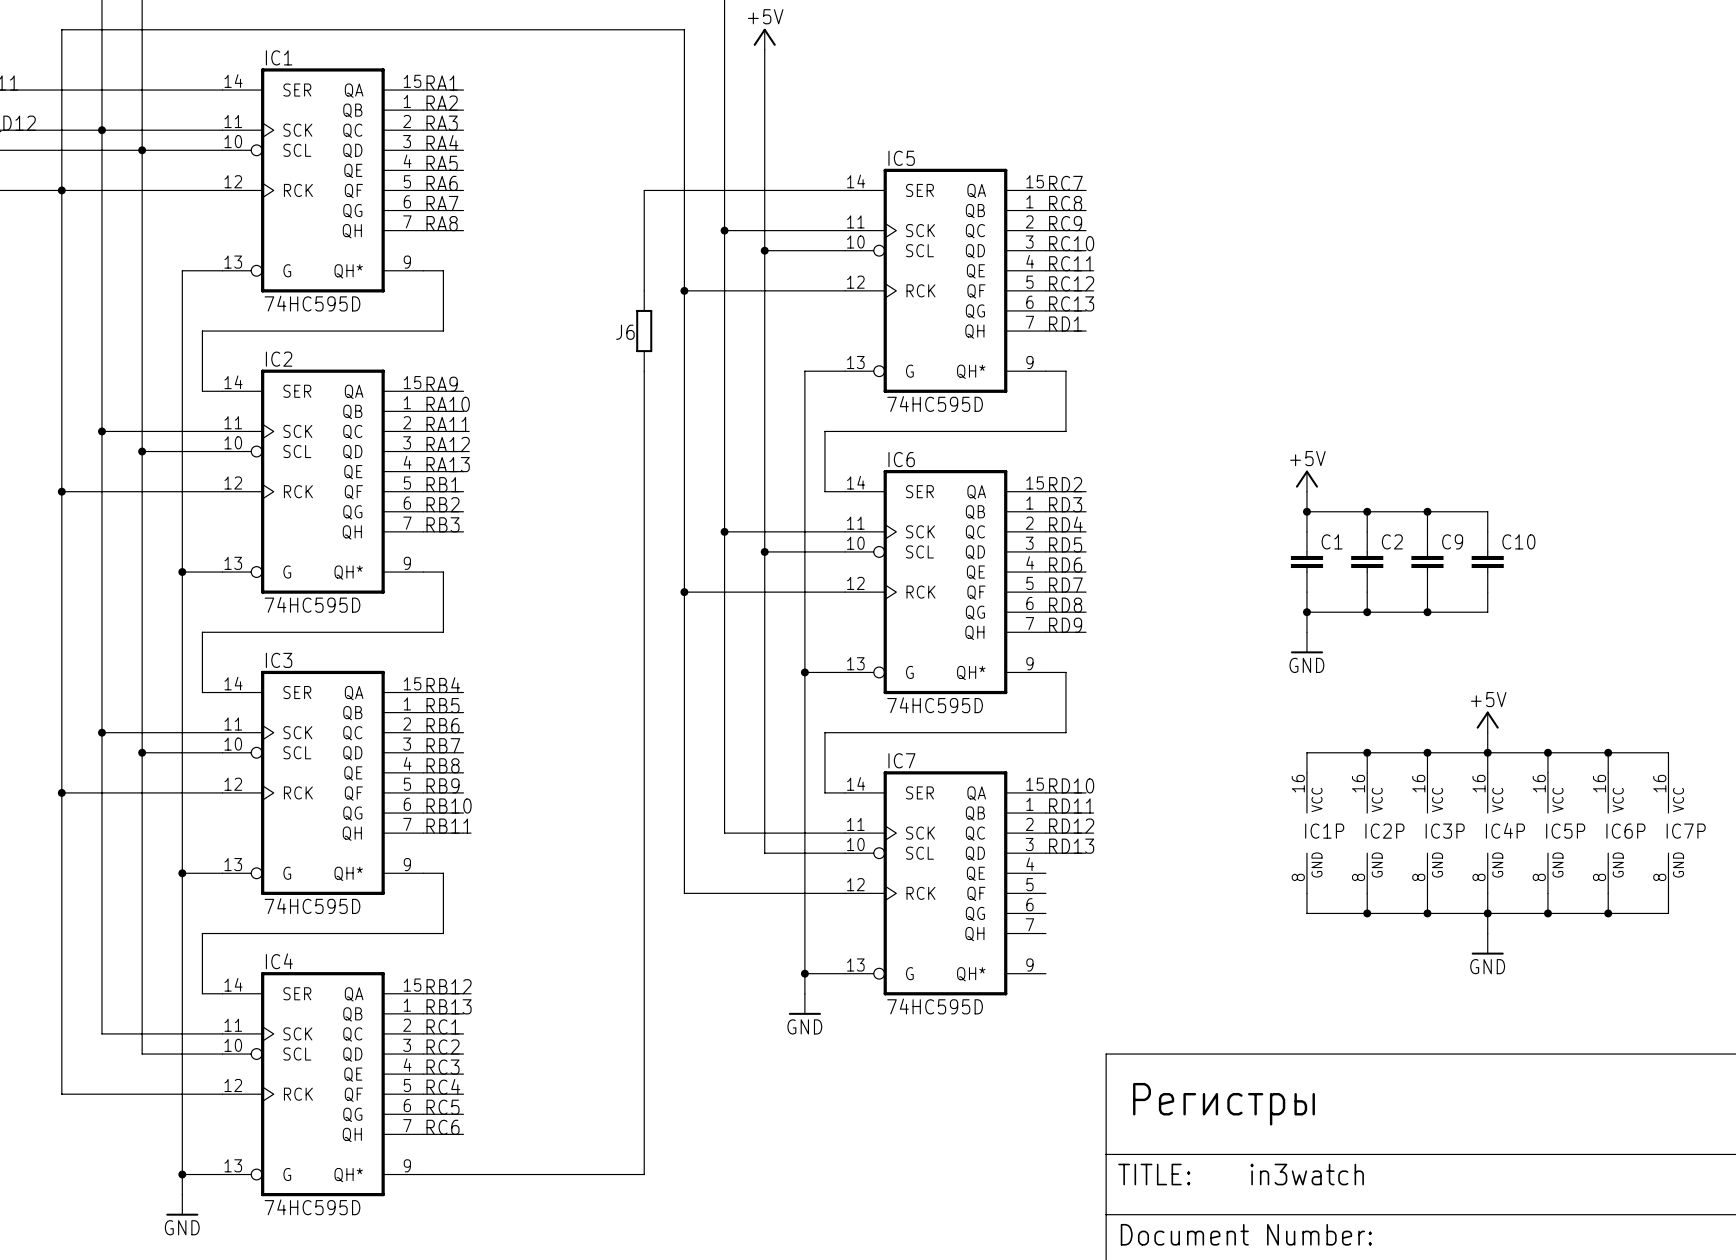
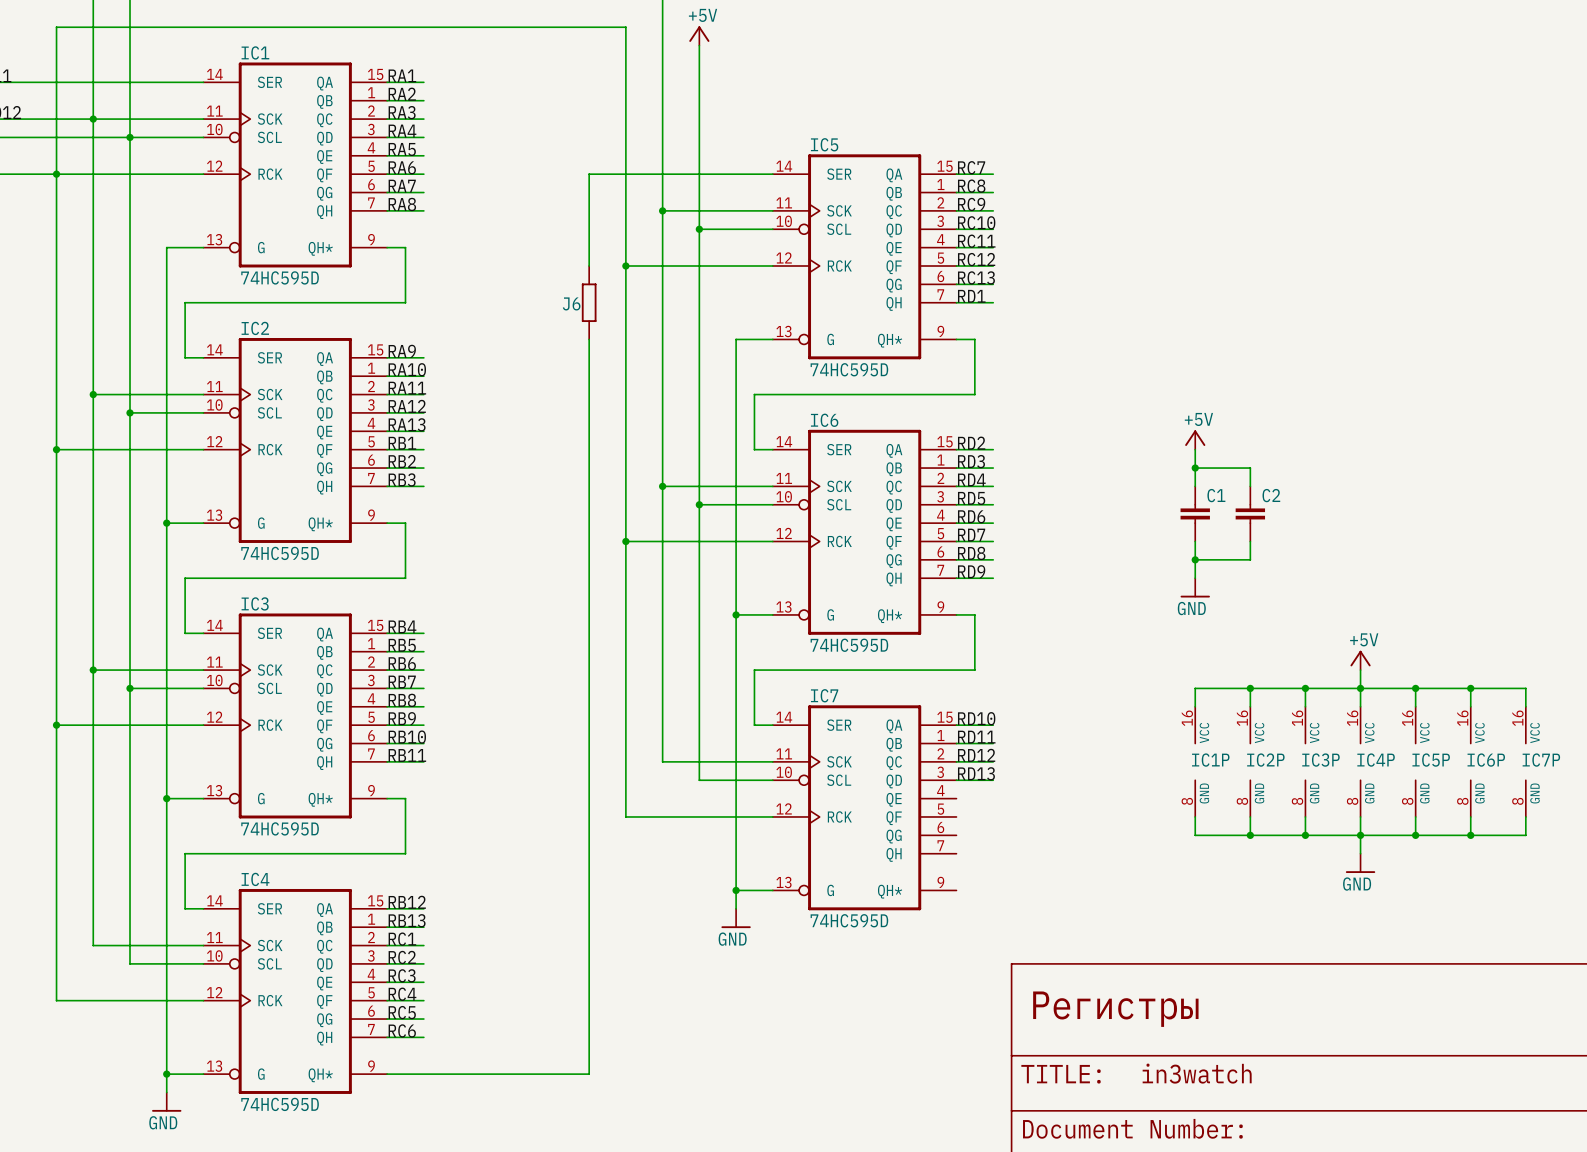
wire: (1367, 511) (1487, 511) (1487, 531) -> none
junction: (1367, 511) -> none
wire: (1427, 511) (1427, 531) -> none
junction: (1427, 511) -> none
C9: (1427, 561) -> none
C10: (1487, 561) -> none
wire: (1427, 592) (1427, 612) -> none
wire: (1487, 592) (1487, 612) (1367, 612) -> none
junction: (1367, 612) -> none
junction: (1427, 612) -> none

